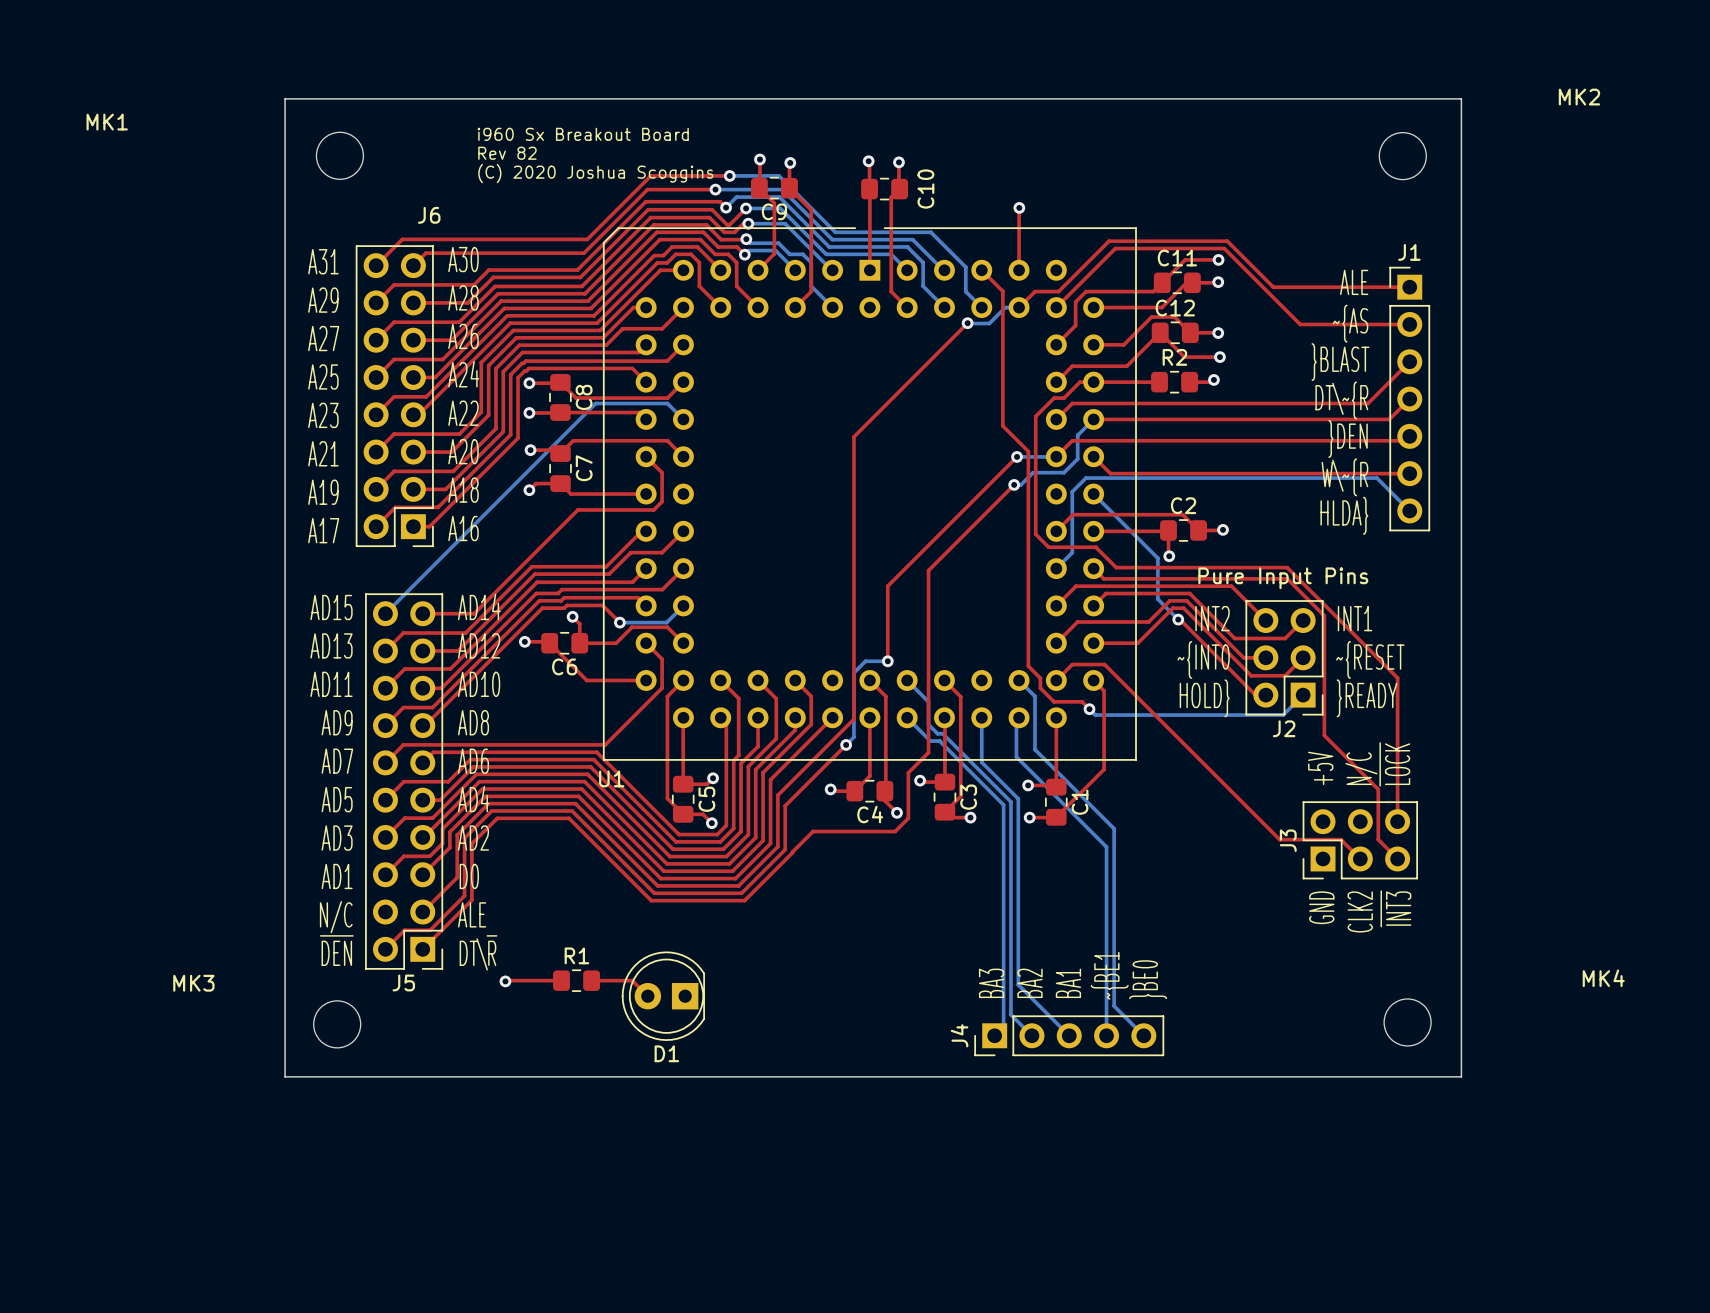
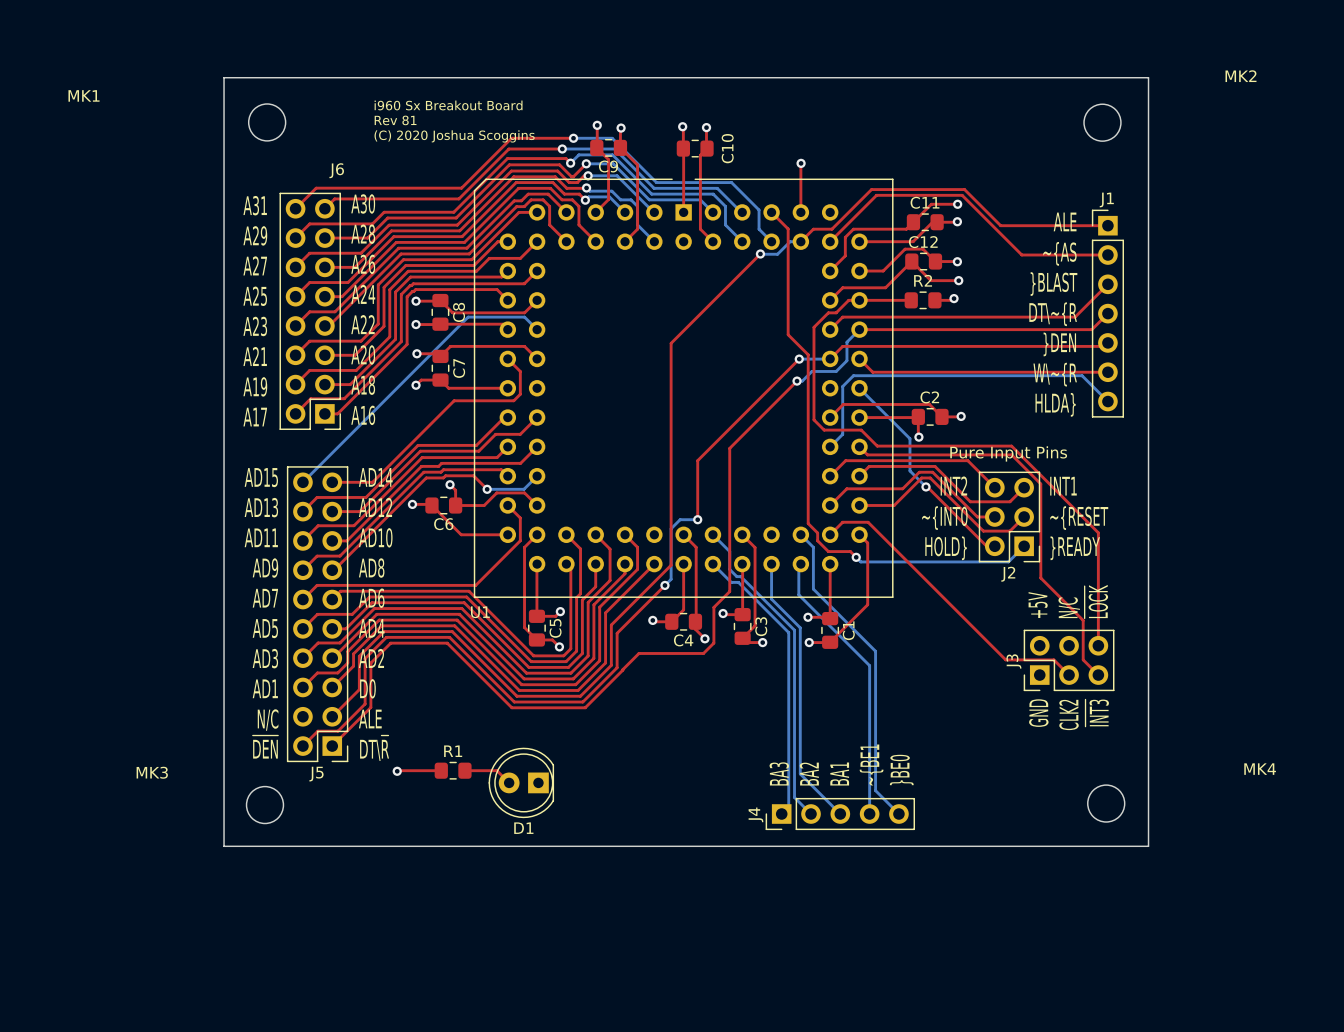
text: Rev 82 (507, 153) -> Rev 81 (395, 120)

